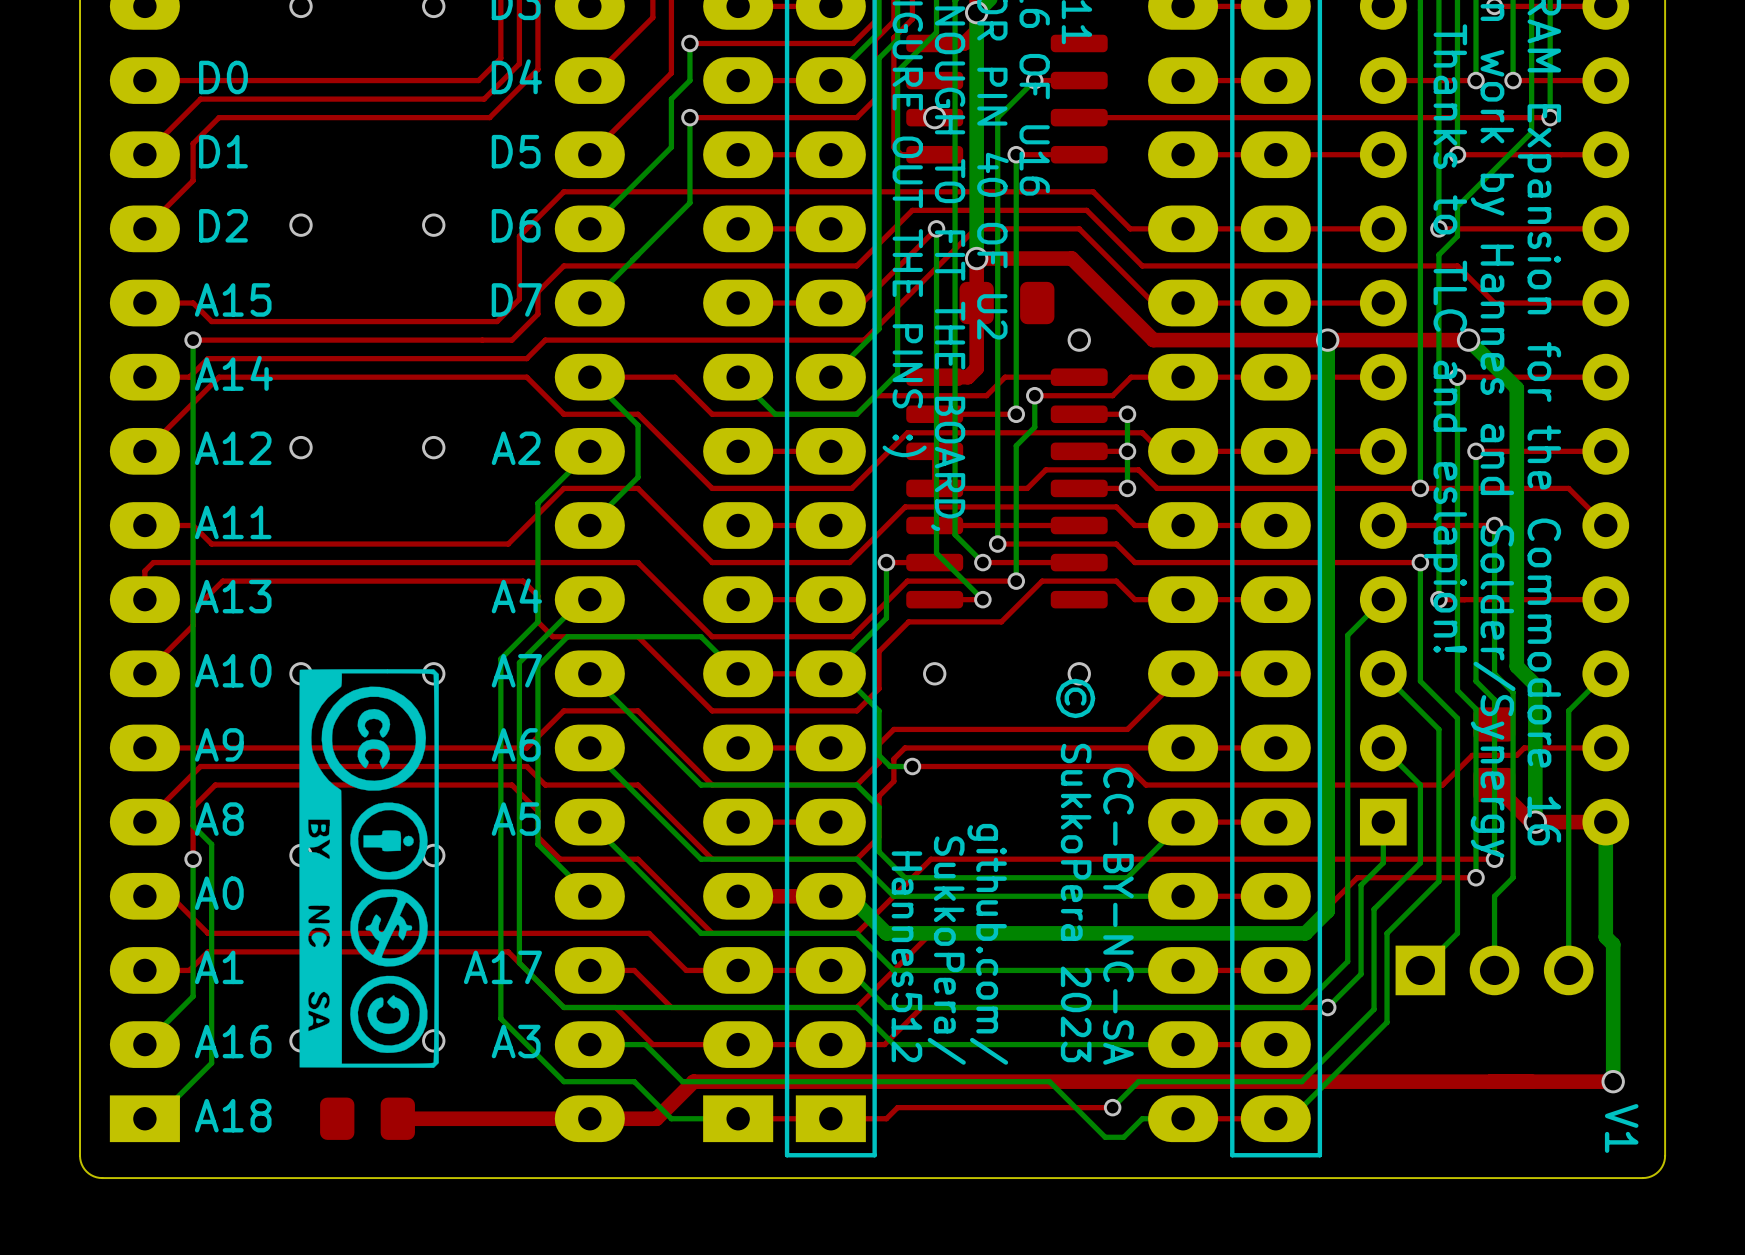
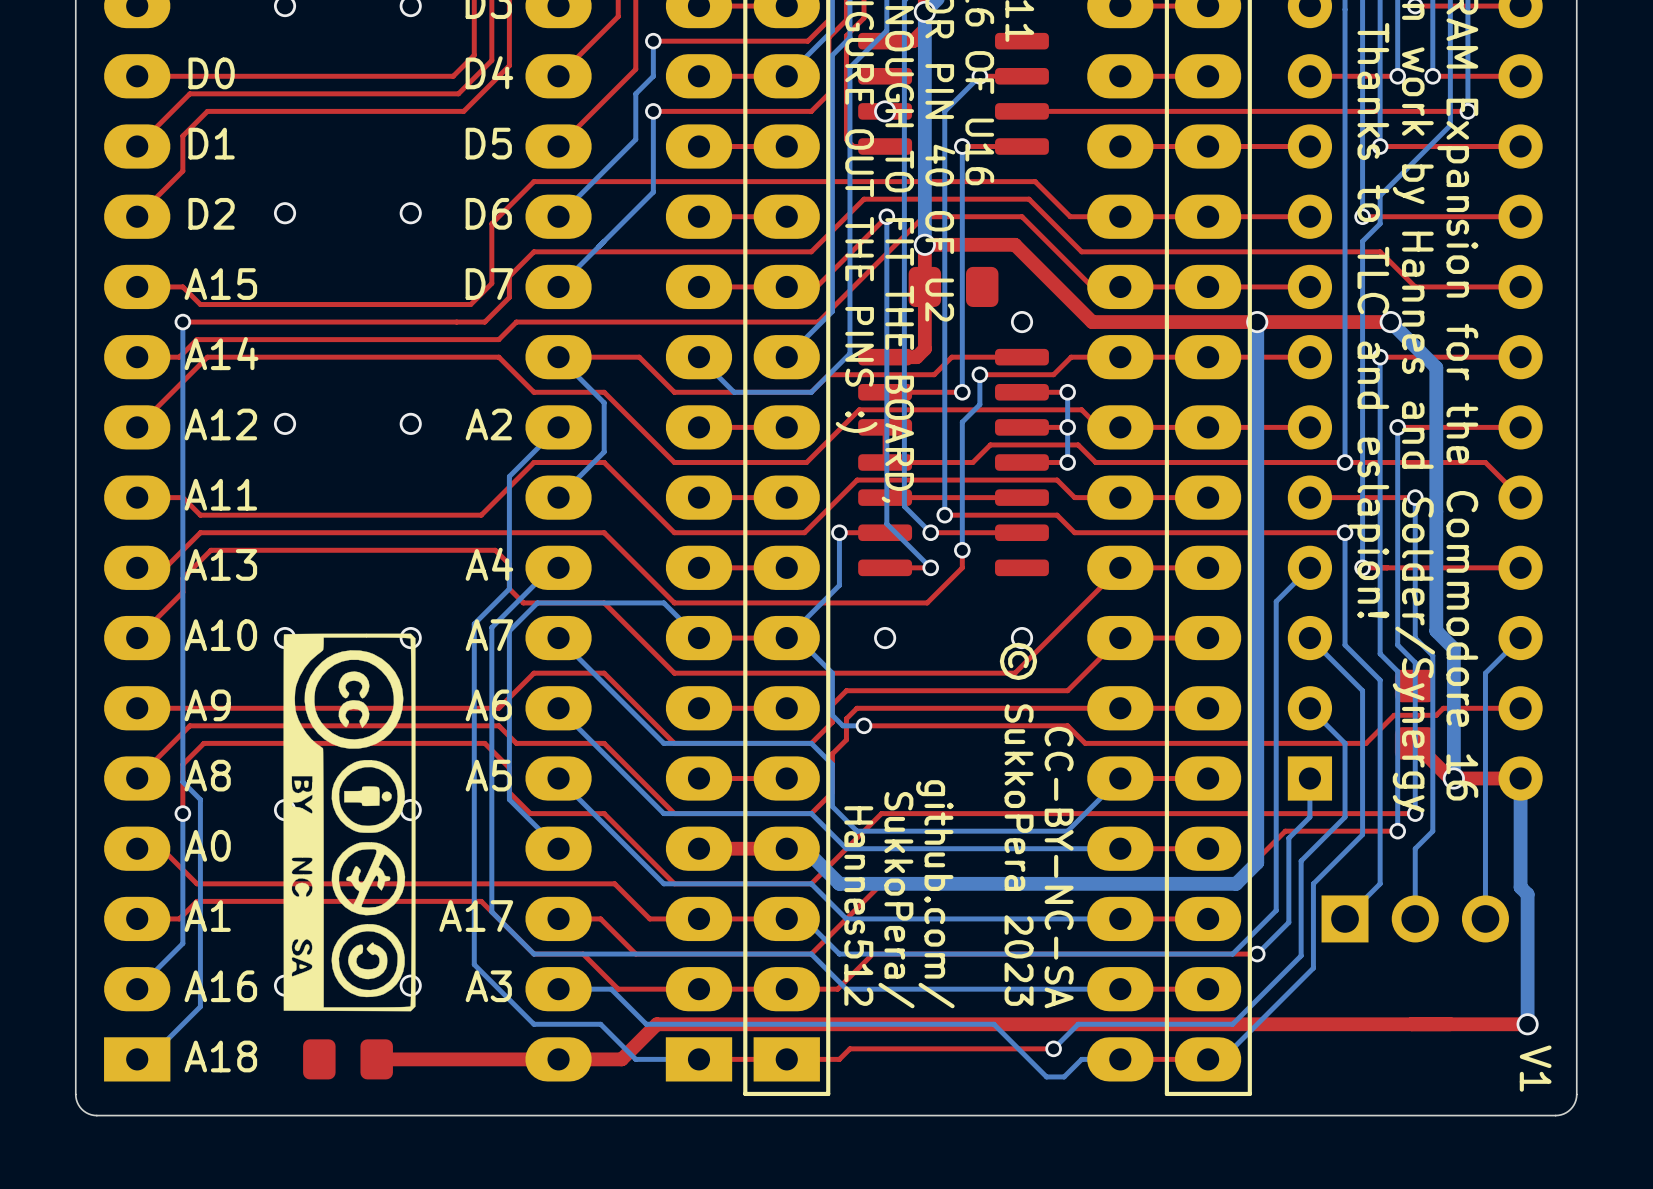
top track: (211, 562) (153, 562) (144, 571) (144, 599) -> (200, 532) (165, 567) (137, 567)
top track: (1016, 581) (907, 581) (851, 636) -> (962, 550) (962, 567) (927, 602) (806, 602)
top track: (1183, 599) (1134, 599) (1116, 581) (1042, 581) (1001, 621) (908, 621) (879, 651) (879, 688) (856, 710) -> (1120, 567) (1014, 673) (811, 673)

